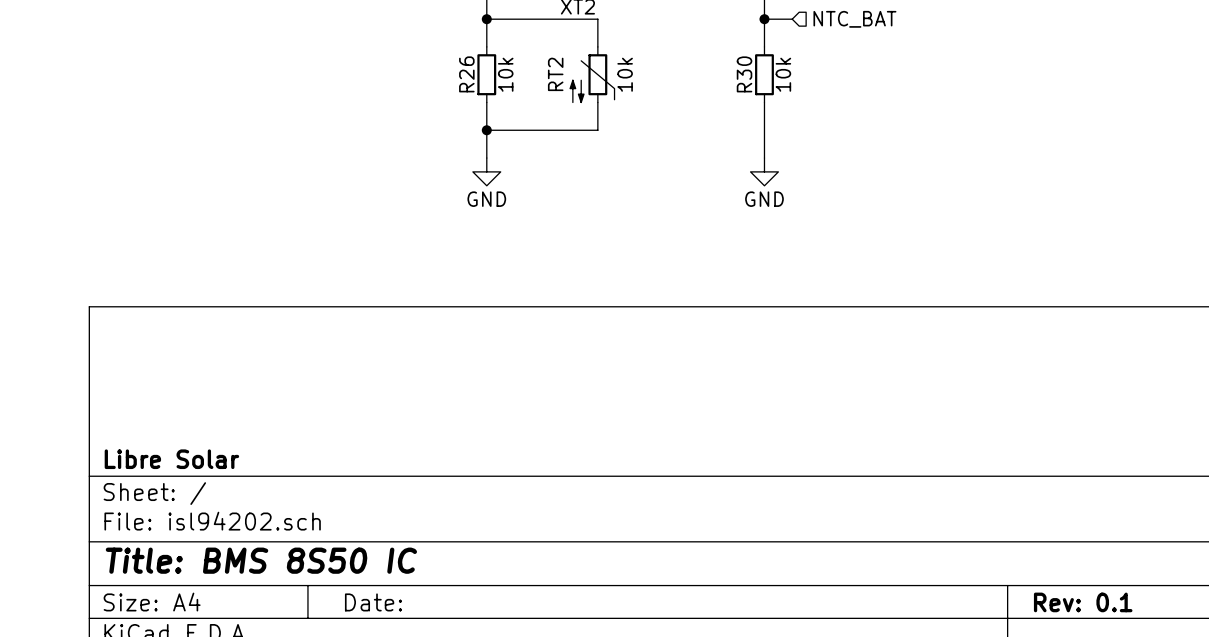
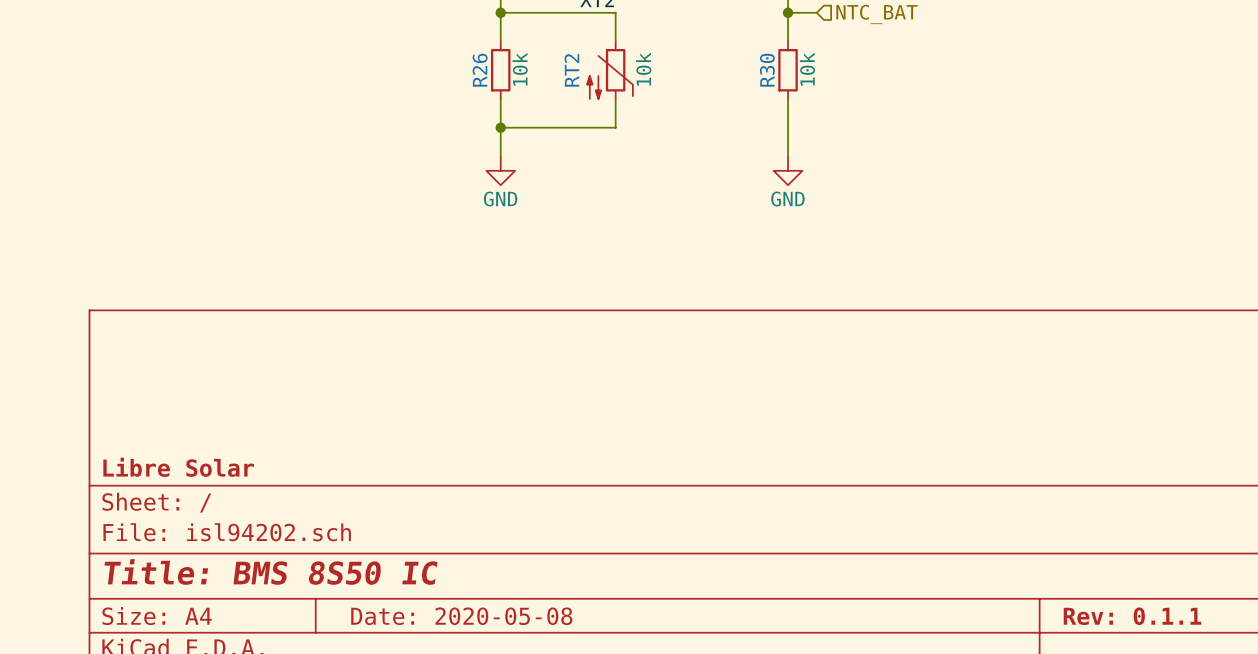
title block: Date: (373, 602) -> Date: 2020-05-08 (461, 616)
title block: Rev: 0.1 (1083, 602) -> Rev: 0.1.1 (1132, 616)

